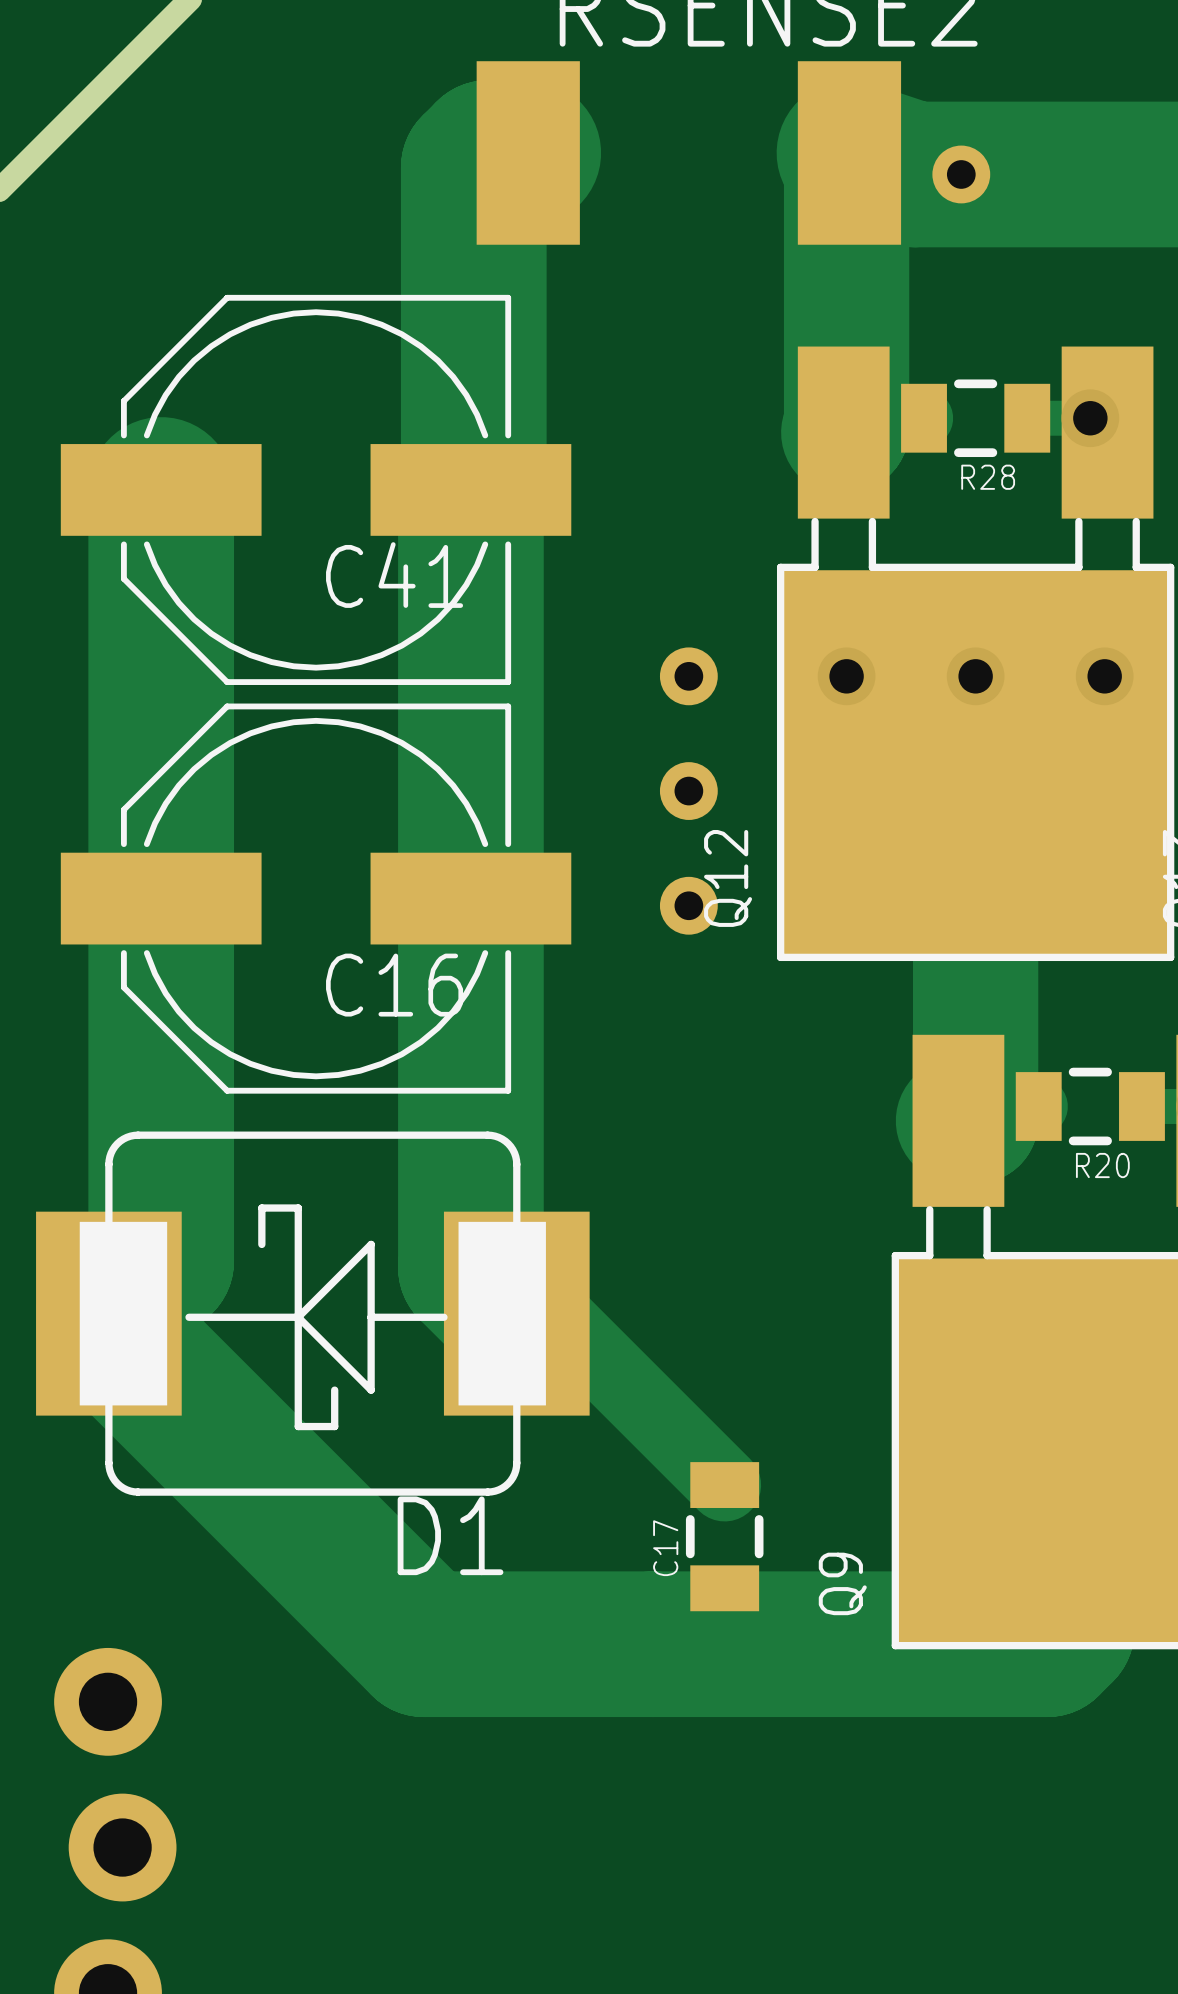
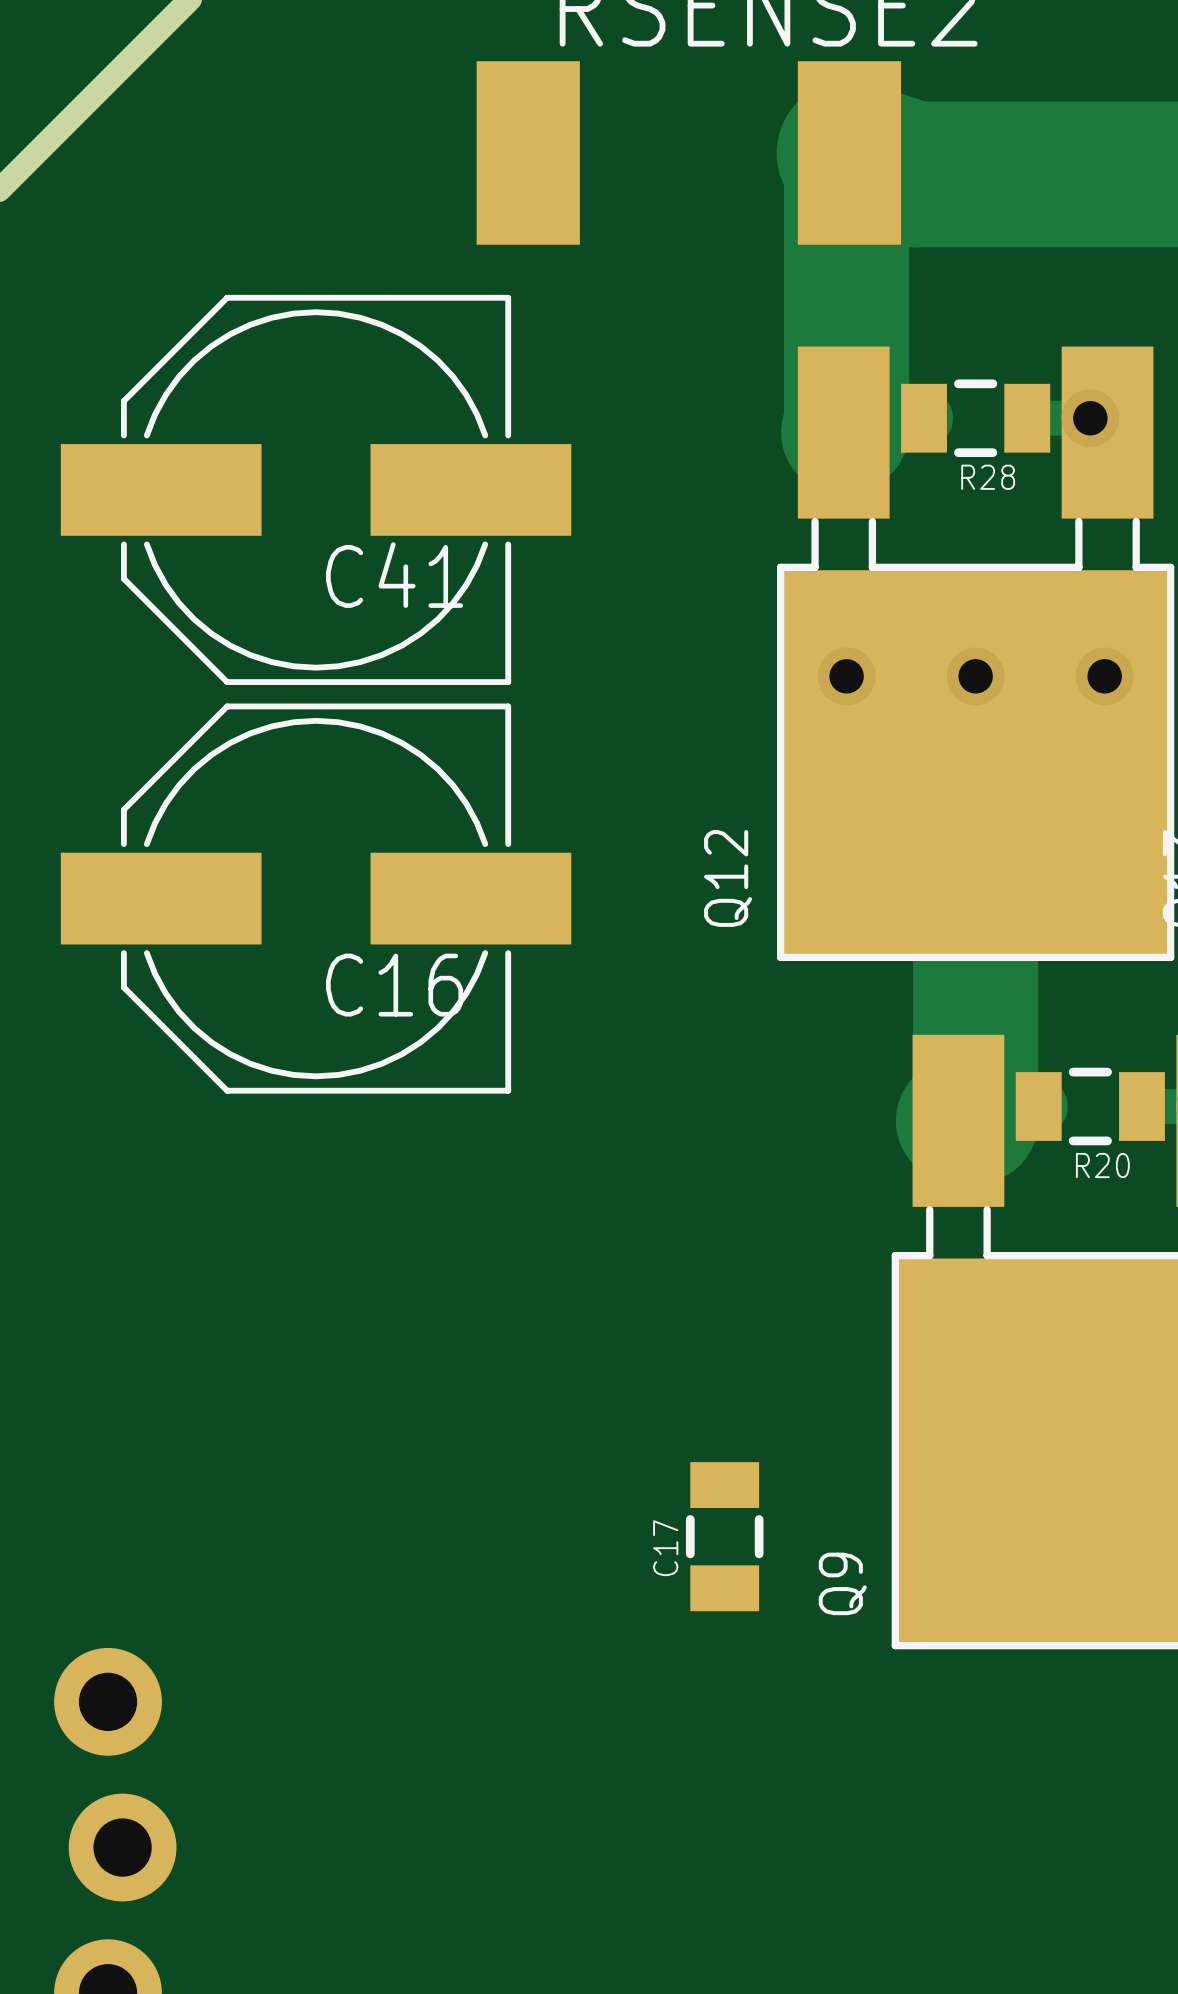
track: (528, 152) (488, 152) (473, 167) (473, 487) (470, 489) (470, 1267) (516, 1313) (553, 1313) (724, 1485) -> none
part: (961, 174) -> none
track: (161, 489) (161, 1261) (108, 1313) (108, 1329) (423, 1644) (1047, 1644) (1061, 1629) (1061, 1479) (1090, 1450) -> none
part: (688, 676) -> none
part: (688, 791) -> none
part: (688, 905) -> none
D1: (312, 1313) -> none

